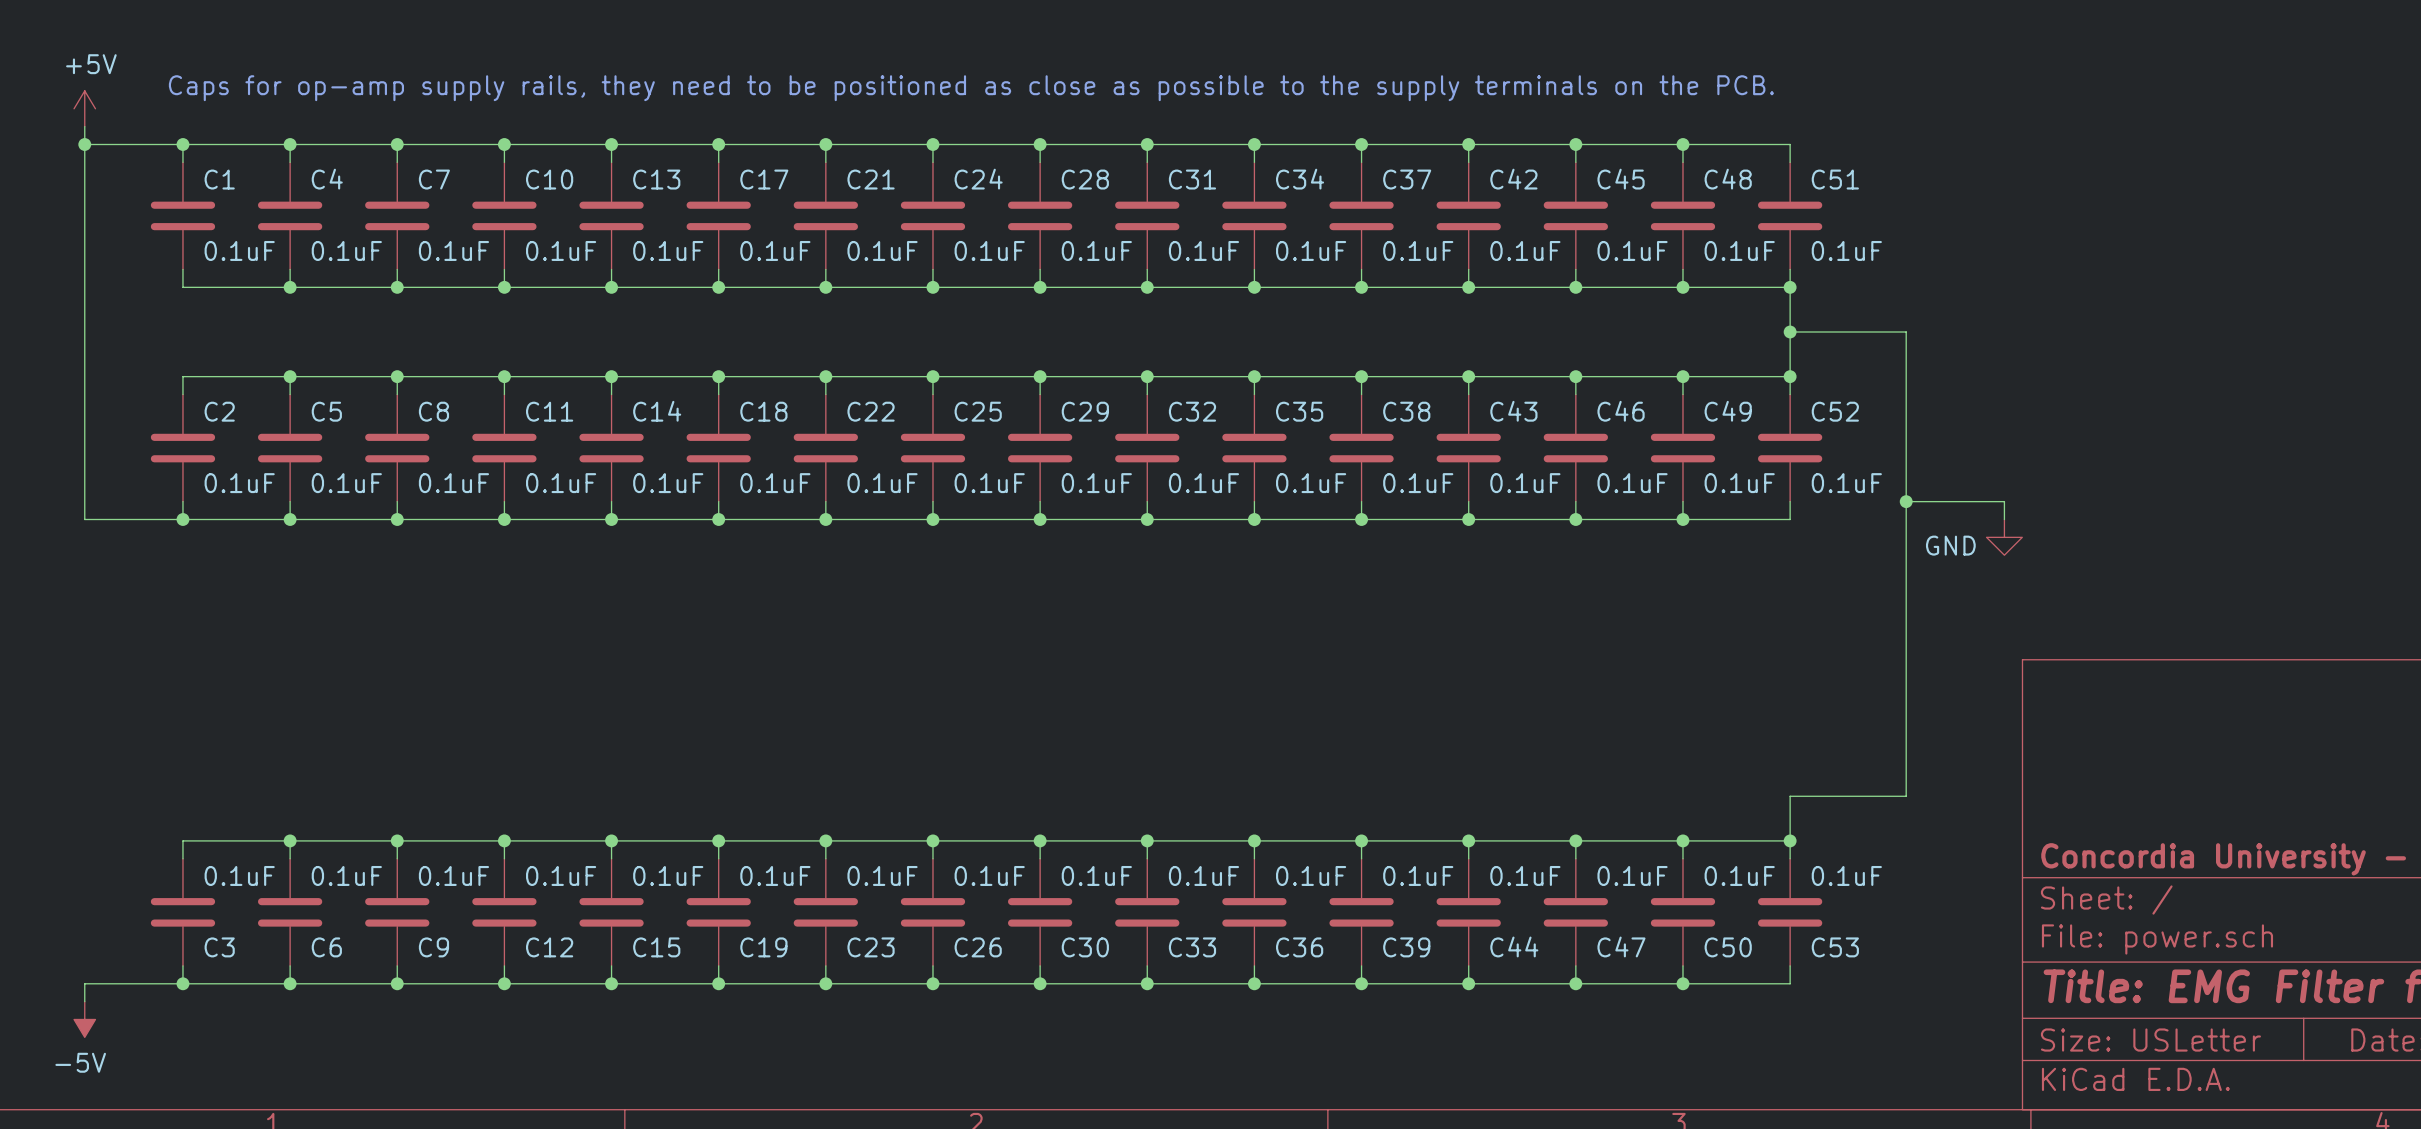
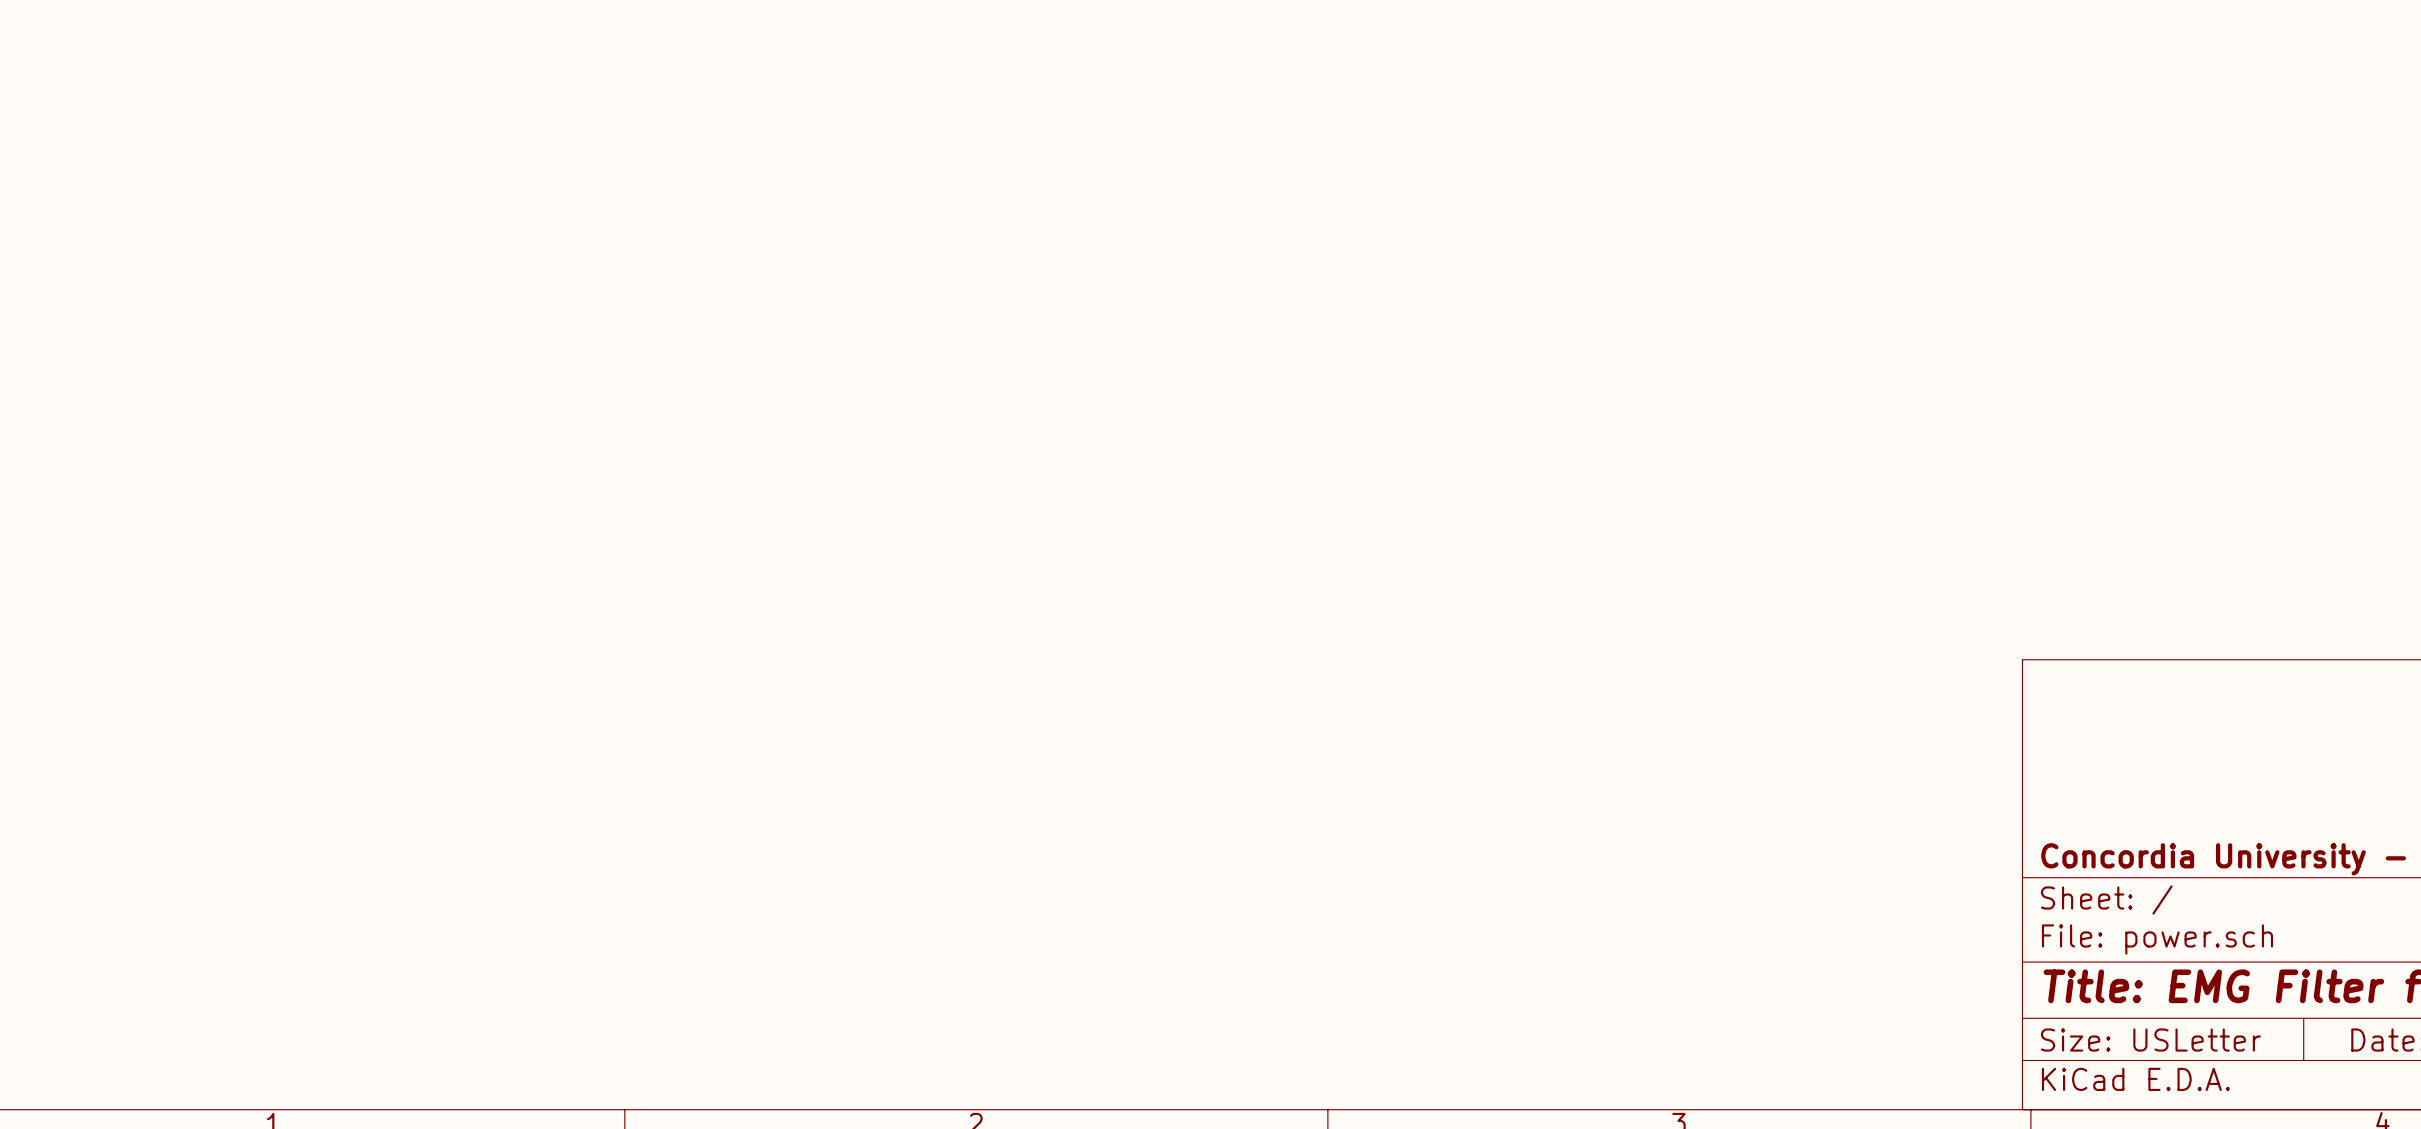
text: Caps for op-amp supply rails, they need to be positioned as close as possible to the supply terminals on the PCB. (971, 88) -> none
power symbol: +5V (84, 108) -> none
wire: (84, 126) (84, 519) (1790, 519) (1790, 501) -> none
wire: (84, 144) (1790, 144) (1790, 162) -> none
junction: (84, 144) -> none
wire: (182, 144) (182, 162) -> none
junction: (182, 144) -> none
wire: (290, 144) (290, 162) -> none
junction: (290, 144) -> none
wire: (397, 144) (397, 162) -> none
junction: (397, 144) -> none
wire: (504, 144) (504, 162) -> none
junction: (504, 144) -> none
wire: (611, 144) (611, 162) -> none
junction: (611, 144) -> none
wire: (718, 144) (718, 162) -> none
junction: (718, 144) -> none
wire: (825, 144) (825, 162) -> none
junction: (825, 144) -> none
wire: (932, 144) (932, 162) -> none
junction: (932, 144) -> none
wire: (1040, 144) (1040, 162) -> none
junction: (1040, 144) -> none
wire: (1147, 144) (1147, 162) -> none
junction: (1147, 144) -> none
wire: (1254, 144) (1254, 162) -> none
junction: (1254, 144) -> none
wire: (1361, 144) (1361, 162) -> none
junction: (1361, 144) -> none
wire: (1468, 144) (1468, 162) -> none
junction: (1468, 144) -> none
wire: (1575, 144) (1575, 162) -> none
junction: (1575, 144) -> none
wire: (1682, 144) (1682, 162) -> none
junction: (1682, 144) -> none
C1: 0.1uF (182, 215) -> none
C4: 0.1uF (290, 215) -> none
C7: 0.1uF (397, 215) -> none
C10: 0.1uF (504, 215) -> none
C13: 0.1uF (611, 215) -> none
C17: 0.1uF (718, 215) -> none
C21: 0.1uF (825, 215) -> none
C24: 0.1uF (932, 215) -> none
C28: 0.1uF (1040, 215) -> none
C31: 0.1uF (1147, 215) -> none
C34: 0.1uF (1254, 215) -> none
C37: 0.1uF (1361, 215) -> none
C42: 0.1uF (1468, 215) -> none
C45: 0.1uF (1575, 215) -> none
C48: 0.1uF (1682, 215) -> none
C51: 0.1uF (1790, 215) -> none
wire: (182, 269) (182, 287) (1790, 287) -> none
wire: (290, 269) (290, 287) -> none
wire: (397, 269) (397, 287) -> none
wire: (504, 269) (504, 287) -> none
wire: (611, 269) (611, 287) -> none
wire: (718, 269) (718, 287) -> none
wire: (825, 269) (825, 287) -> none
wire: (932, 269) (932, 287) -> none
wire: (1040, 269) (1040, 287) -> none
wire: (1147, 269) (1147, 287) -> none
wire: (1254, 269) (1254, 287) -> none
wire: (1361, 269) (1361, 287) -> none
wire: (1468, 269) (1468, 287) -> none
wire: (1575, 269) (1575, 287) -> none
wire: (1682, 269) (1682, 287) -> none
wire: (1790, 269) (1790, 394) -> none
junction: (290, 287) -> none
junction: (397, 287) -> none
junction: (504, 287) -> none
junction: (611, 287) -> none
junction: (718, 287) -> none
junction: (825, 287) -> none
junction: (932, 287) -> none
junction: (1040, 287) -> none
junction: (1147, 287) -> none
junction: (1254, 287) -> none
junction: (1361, 287) -> none
junction: (1468, 287) -> none
junction: (1575, 287) -> none
junction: (1682, 287) -> none
junction: (1790, 287) -> none
wire: (1790, 331) (1906, 331) (1906, 796) (1790, 796) (1790, 858) -> none
junction: (1790, 331) -> none
wire: (290, 376) (290, 394) -> none
junction: (290, 376) -> none
wire: (397, 376) (397, 394) -> none
junction: (397, 376) -> none
wire: (504, 376) (504, 394) -> none
junction: (504, 376) -> none
wire: (611, 376) (611, 394) -> none
junction: (611, 376) -> none
wire: (718, 376) (718, 394) -> none
junction: (718, 376) -> none
wire: (825, 376) (825, 394) -> none
junction: (825, 376) -> none
wire: (932, 376) (932, 394) -> none
junction: (932, 376) -> none
wire: (1040, 376) (1040, 394) -> none
junction: (1040, 376) -> none
wire: (1147, 376) (1147, 394) -> none
junction: (1147, 376) -> none
wire: (1254, 376) (1254, 394) -> none
junction: (1254, 376) -> none
wire: (1361, 376) (1361, 394) -> none
junction: (1361, 376) -> none
wire: (1468, 376) (1468, 394) -> none
junction: (1468, 376) -> none
wire: (1575, 376) (1575, 394) -> none
junction: (1575, 376) -> none
wire: (1682, 376) (1682, 394) -> none
junction: (1682, 376) -> none
wire: (1790, 376) (182, 376) (182, 394) -> none
junction: (1790, 376) -> none
C2: 0.1uF (182, 448) -> none
C5: 0.1uF (290, 448) -> none
C8: 0.1uF (397, 448) -> none
C11: 0.1uF (504, 448) -> none
C14: 0.1uF (611, 448) -> none
C18: 0.1uF (718, 448) -> none
C22: 0.1uF (825, 448) -> none
C25: 0.1uF (932, 448) -> none
C29: 0.1uF (1040, 448) -> none
C32: 0.1uF (1147, 448) -> none
C35: 0.1uF (1254, 448) -> none
C38: 0.1uF (1361, 448) -> none
C43: 0.1uF (1468, 448) -> none
C46: 0.1uF (1575, 448) -> none
C49: 0.1uF (1682, 448) -> none
C52: 0.1uF (1790, 448) -> none
wire: (182, 501) (182, 519) -> none
wire: (290, 501) (290, 519) -> none
wire: (397, 501) (397, 519) -> none
wire: (504, 501) (504, 519) -> none
wire: (611, 501) (611, 519) -> none
wire: (718, 501) (718, 519) -> none
wire: (825, 501) (825, 519) -> none
wire: (932, 501) (932, 519) -> none
wire: (1040, 501) (1040, 519) -> none
wire: (1147, 501) (1147, 519) -> none
wire: (1254, 501) (1254, 519) -> none
wire: (1361, 501) (1361, 519) -> none
wire: (1468, 501) (1468, 519) -> none
wire: (1575, 501) (1575, 519) -> none
wire: (1682, 501) (1682, 519) -> none
wire: (1906, 501) (2004, 501) (2004, 519) -> none
junction: (1906, 501) -> none
junction: (182, 519) -> none
junction: (290, 519) -> none
junction: (397, 519) -> none
junction: (504, 519) -> none
junction: (611, 519) -> none
junction: (718, 519) -> none
junction: (825, 519) -> none
junction: (932, 519) -> none
junction: (1040, 519) -> none
junction: (1147, 519) -> none
junction: (1254, 519) -> none
junction: (1361, 519) -> none
junction: (1468, 519) -> none
junction: (1575, 519) -> none
junction: (1682, 519) -> none
power symbol: GND (2004, 537) -> none
wire: (290, 840) (290, 858) -> none
junction: (290, 840) -> none
wire: (397, 840) (397, 858) -> none
junction: (397, 840) -> none
wire: (504, 840) (504, 858) -> none
junction: (504, 840) -> none
wire: (611, 840) (611, 858) -> none
junction: (611, 840) -> none
wire: (718, 840) (718, 858) -> none
junction: (718, 840) -> none
wire: (825, 840) (825, 858) -> none
junction: (825, 840) -> none
wire: (932, 840) (932, 858) -> none
junction: (932, 840) -> none
wire: (1040, 840) (1040, 858) -> none
junction: (1040, 840) -> none
wire: (1147, 840) (1147, 858) -> none
junction: (1147, 840) -> none
wire: (1254, 840) (1254, 858) -> none
junction: (1254, 840) -> none
wire: (1361, 840) (1361, 858) -> none
junction: (1361, 840) -> none
wire: (1468, 840) (1468, 858) -> none
junction: (1468, 840) -> none
wire: (1575, 840) (1575, 858) -> none
junction: (1575, 840) -> none
wire: (1682, 840) (1682, 858) -> none
junction: (1682, 840) -> none
wire: (1790, 840) (182, 840) (182, 858) -> none
junction: (1790, 840) -> none
C3: 0.1uF (182, 912) -> none
C6: 0.1uF (290, 912) -> none
C9: 0.1uF (397, 912) -> none
C12: 0.1uF (504, 912) -> none
C15: 0.1uF (611, 912) -> none
C19: 0.1uF (718, 912) -> none
C23: 0.1uF (825, 912) -> none
C26: 0.1uF (932, 912) -> none
C30: 0.1uF (1040, 912) -> none
C33: 0.1uF (1147, 912) -> none
C36: 0.1uF (1254, 912) -> none
C39: 0.1uF (1361, 912) -> none
C44: 0.1uF (1468, 912) -> none
C47: 0.1uF (1575, 912) -> none
C50: 0.1uF (1682, 912) -> none
C53: 0.1uF (1790, 912) -> none
wire: (182, 965) (182, 983) -> none
wire: (290, 965) (290, 983) -> none
wire: (397, 965) (397, 983) -> none
wire: (504, 965) (504, 983) -> none
wire: (611, 965) (611, 983) -> none
wire: (718, 965) (718, 983) -> none
wire: (825, 965) (825, 983) -> none
wire: (932, 965) (932, 983) -> none
wire: (1040, 965) (1040, 983) -> none
wire: (1147, 965) (1147, 983) -> none
wire: (1254, 965) (1254, 983) -> none
wire: (1361, 965) (1361, 983) -> none
wire: (1468, 965) (1468, 983) -> none
wire: (1575, 965) (1575, 983) -> none
wire: (1682, 965) (1682, 983) -> none
wire: (1790, 965) (1790, 983) (84, 983) (84, 1001) -> none
junction: (182, 983) -> none
junction: (290, 983) -> none
junction: (397, 983) -> none
junction: (504, 983) -> none
junction: (611, 983) -> none
junction: (718, 983) -> none
junction: (825, 983) -> none
junction: (932, 983) -> none
junction: (1040, 983) -> none
junction: (1147, 983) -> none
junction: (1254, 983) -> none
junction: (1361, 983) -> none
junction: (1468, 983) -> none
junction: (1575, 983) -> none
junction: (1682, 983) -> none
power symbol: -5V (84, 1019) -> none

